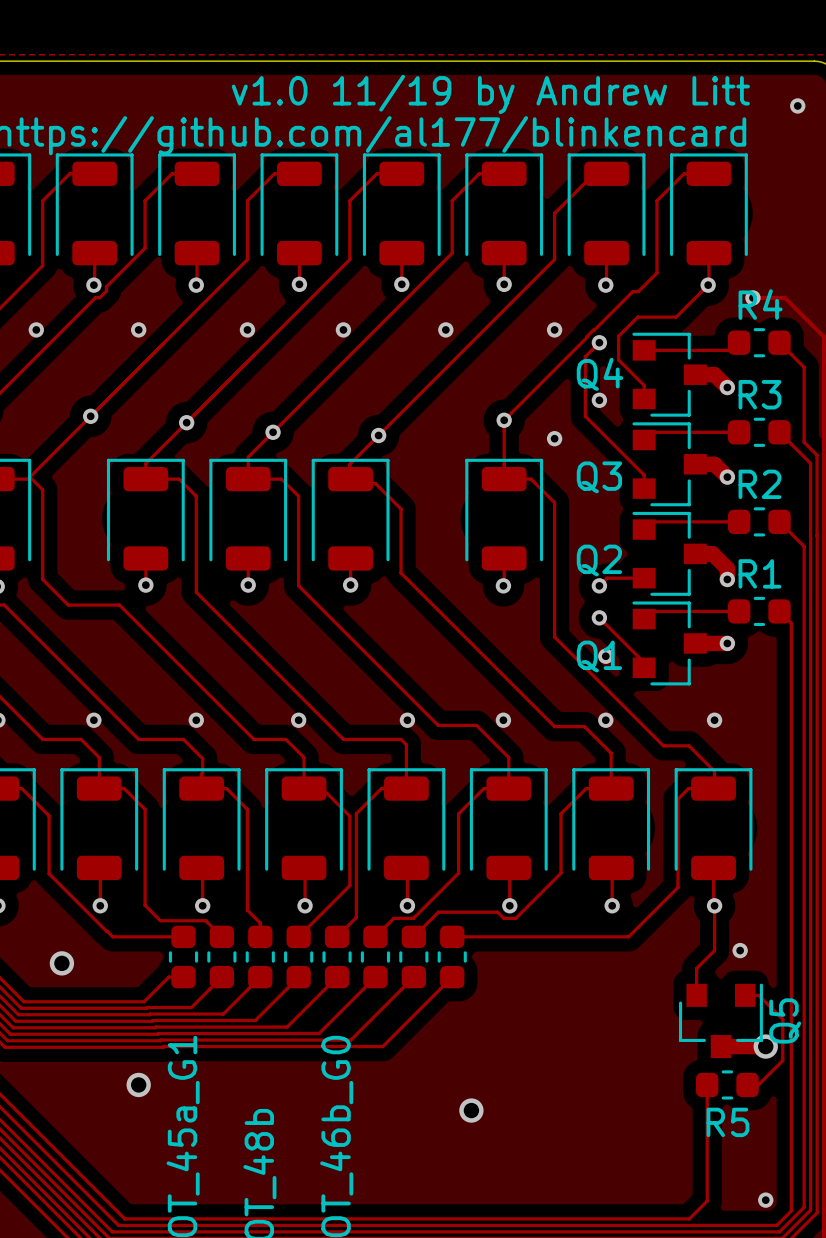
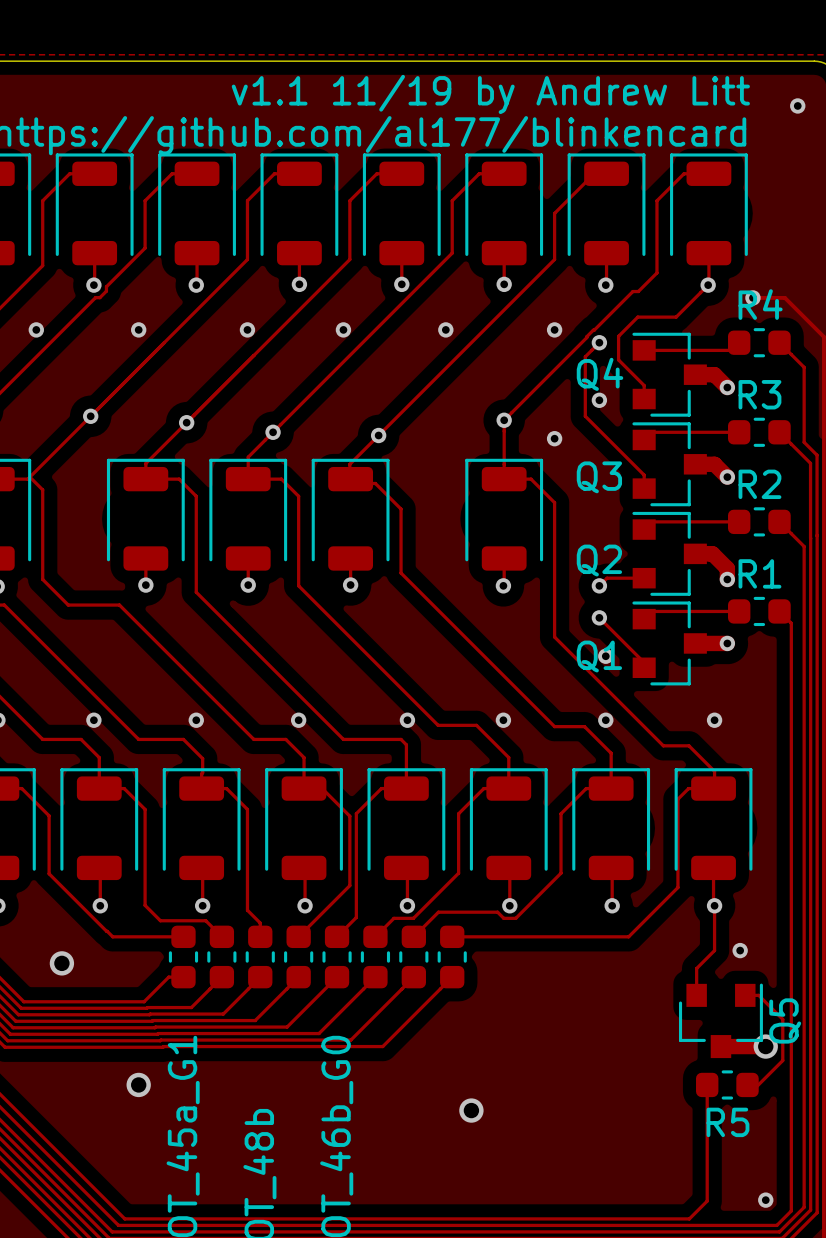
text: v1.0 11/19 by Andrew Litt (490, 94) -> v1.1 11/19 by Andrew Litt (490, 94)

